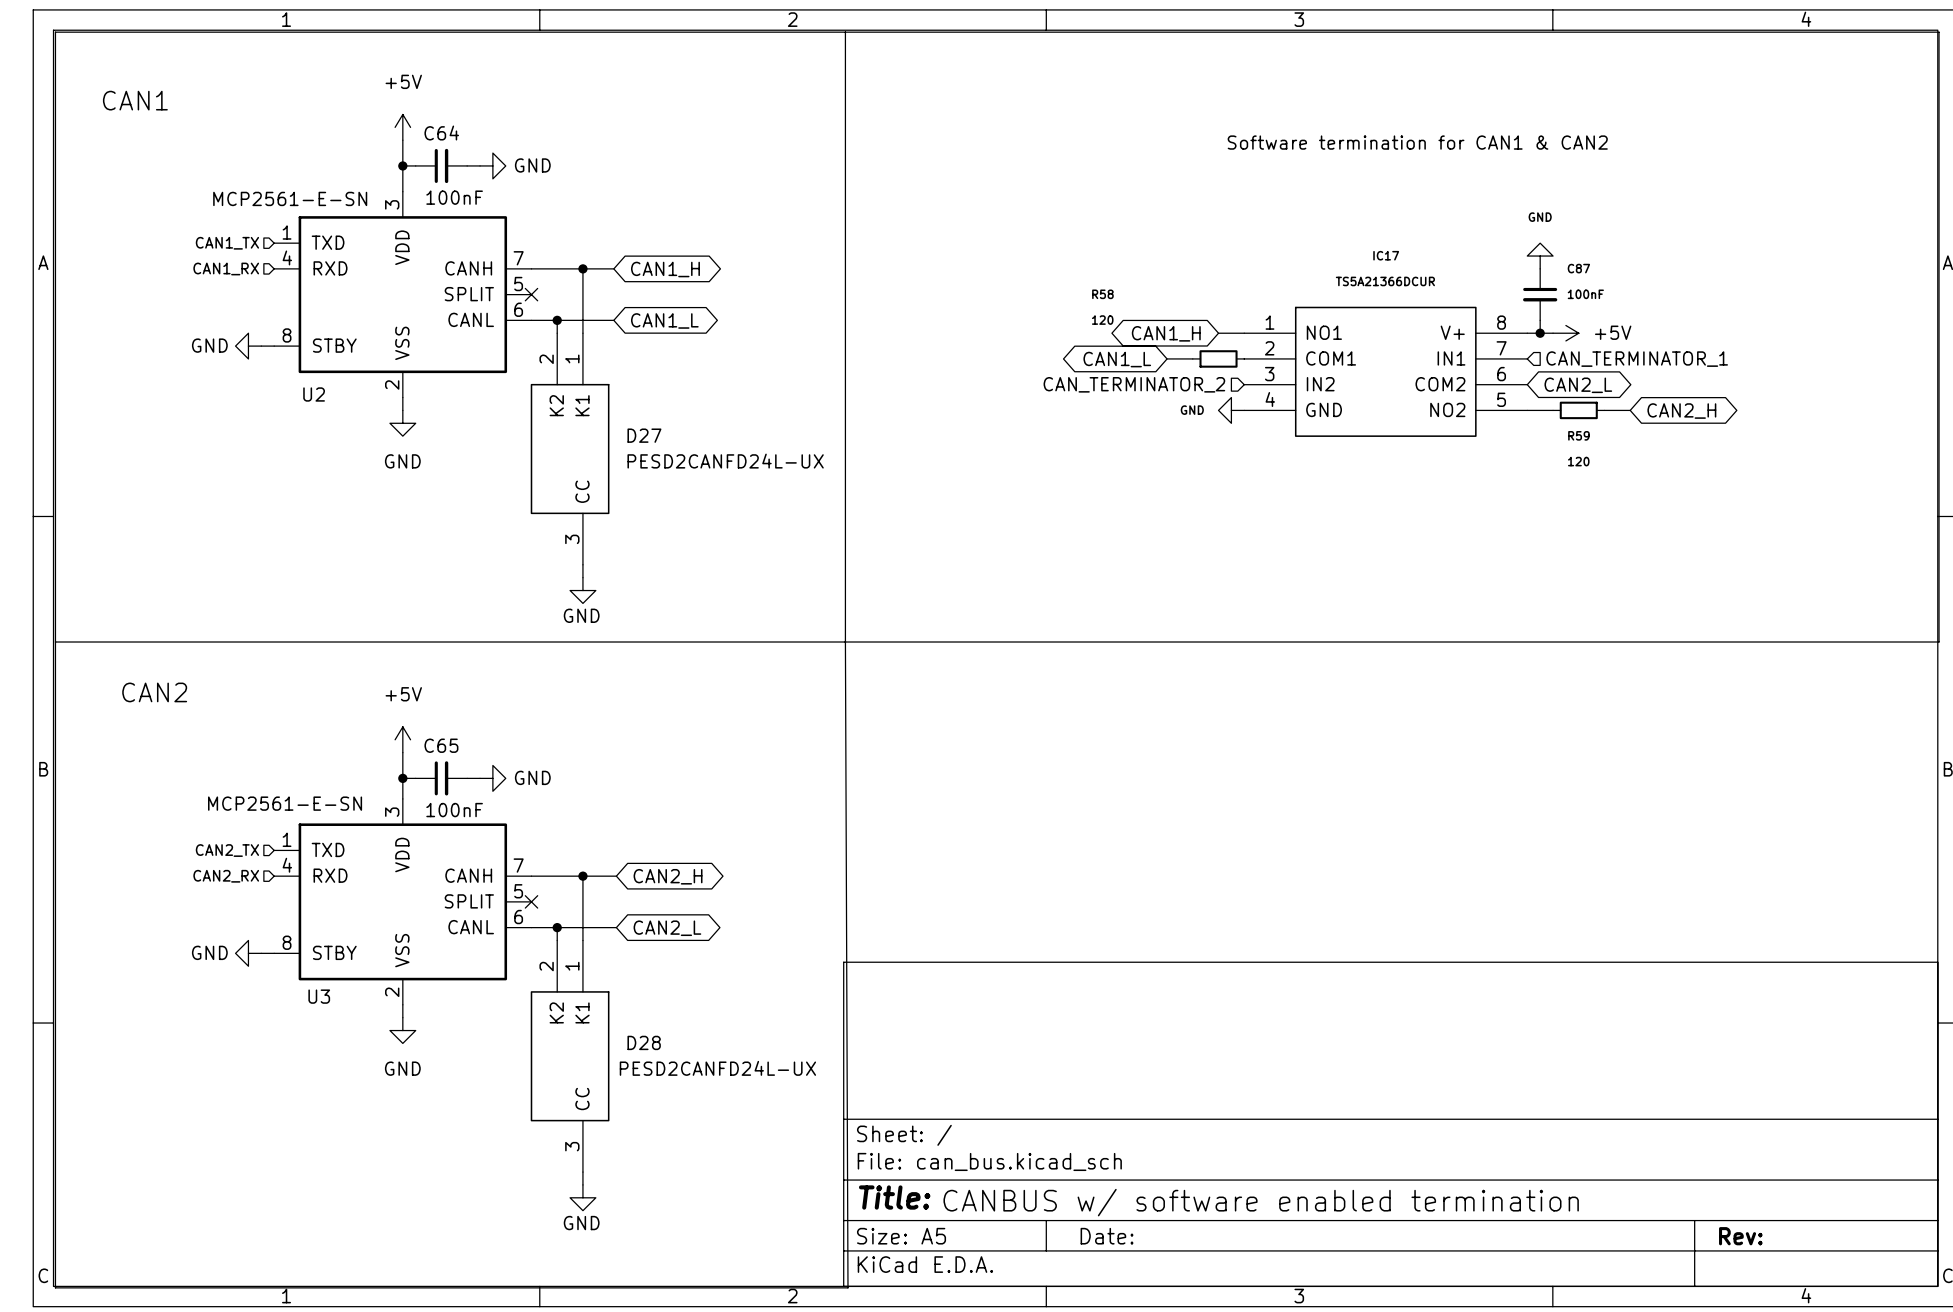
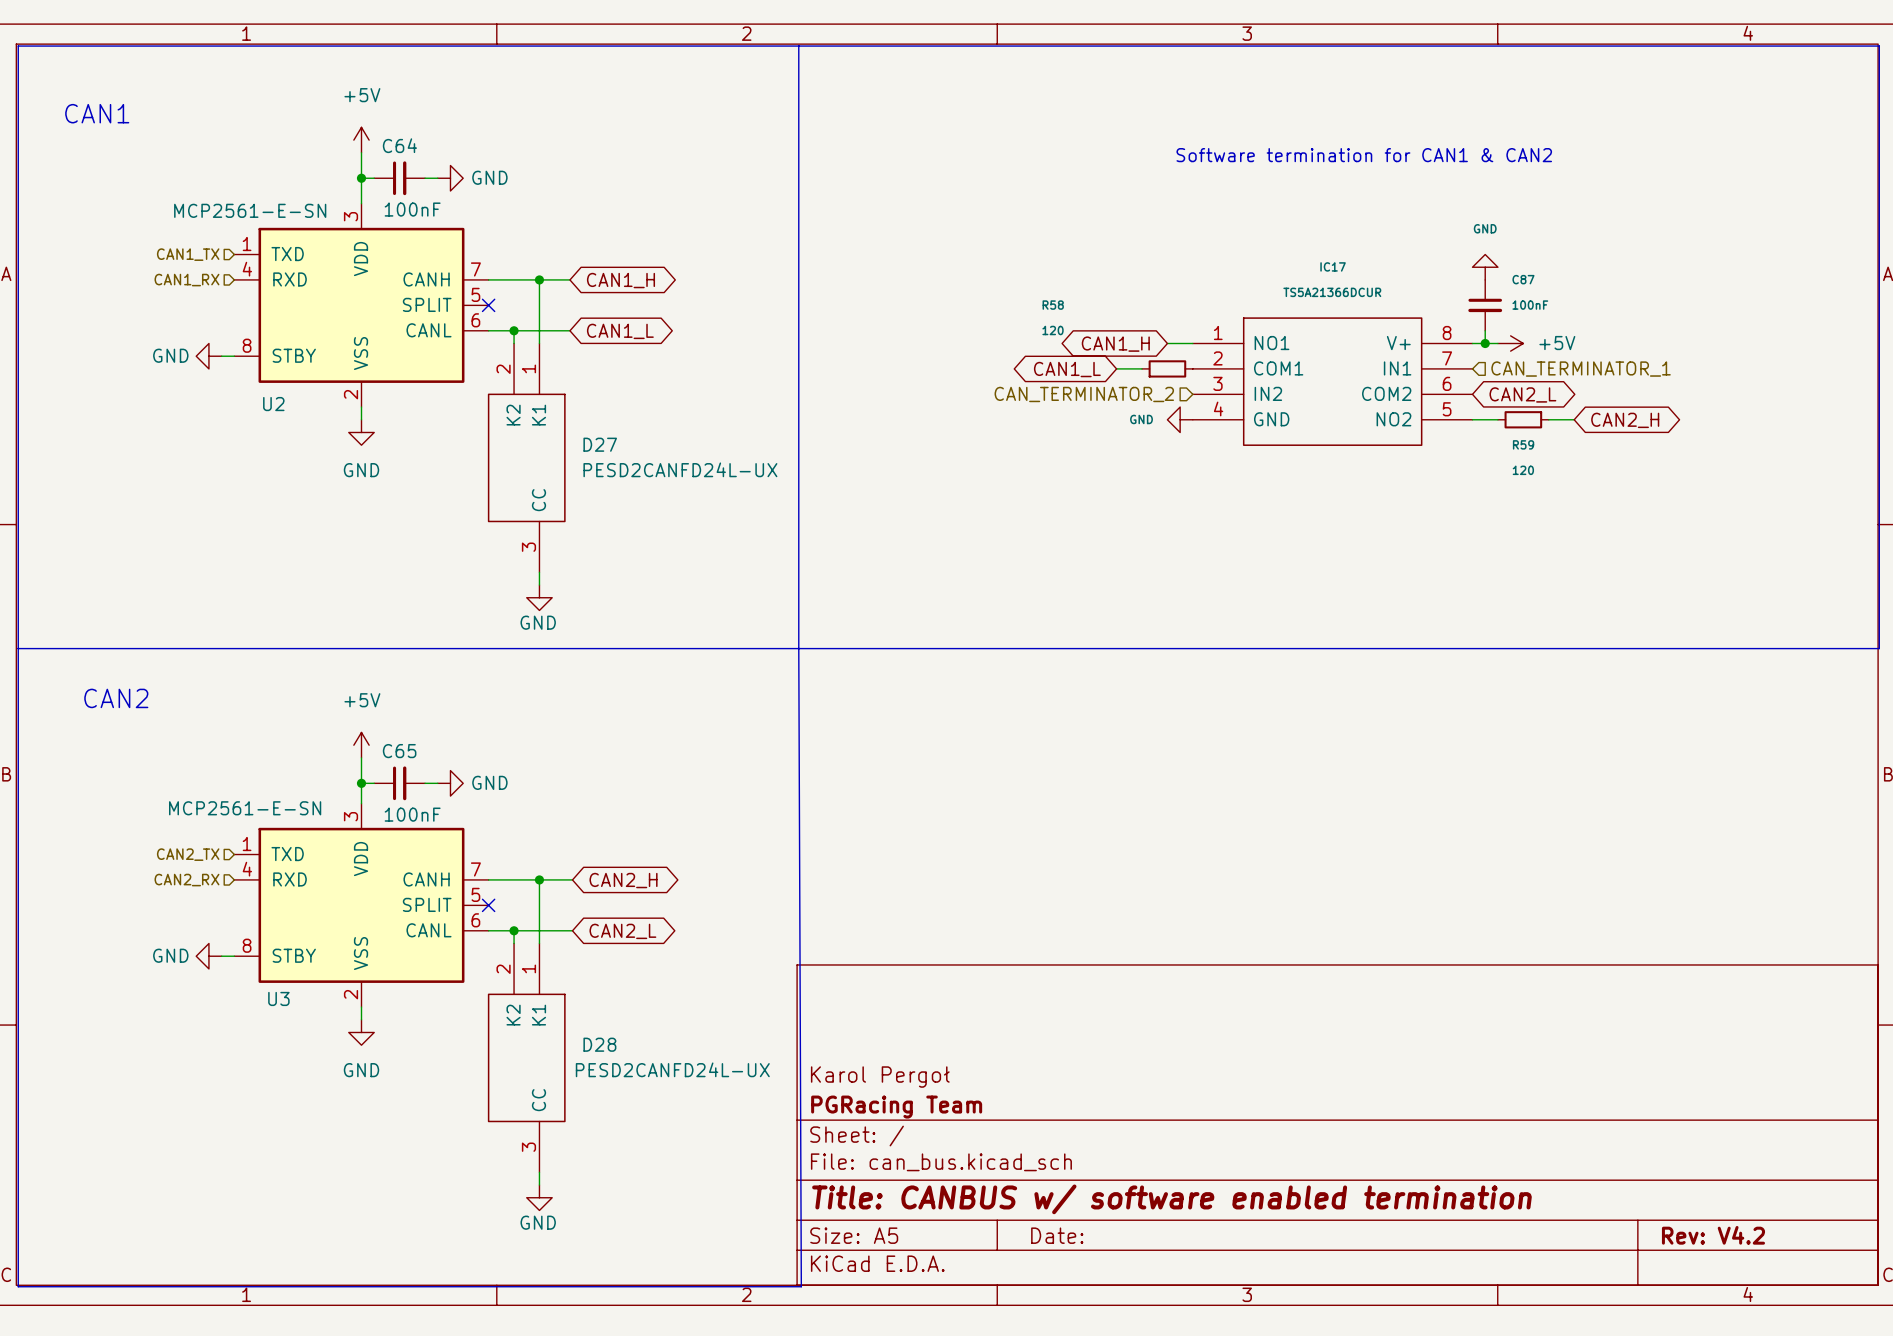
title block: none -> Karol Pergoł (880, 1077)
title block: none -> PGRacing Team (896, 1107)
title block: Title: (894, 1197) -> Title: CANBUS w/ software enabled termination (1171, 1199)
text: CANBUS w/ software enabled termination (1261, 1202) -> none
title block: Rev: (1740, 1236) -> Rev: V4.2 (1713, 1235)

